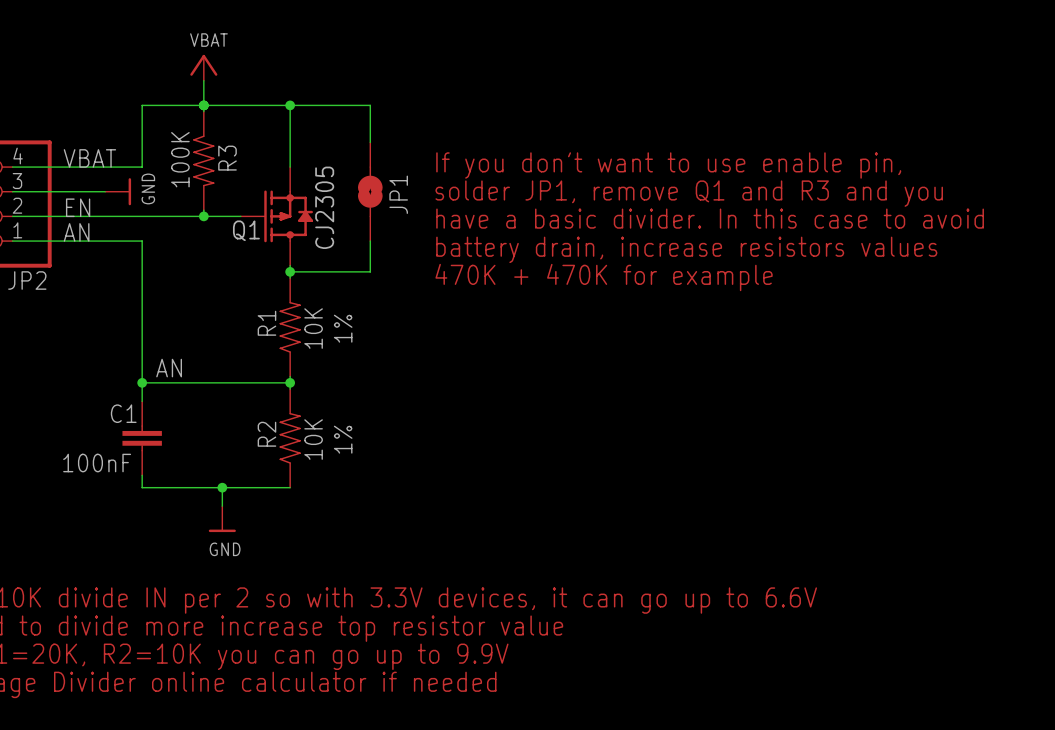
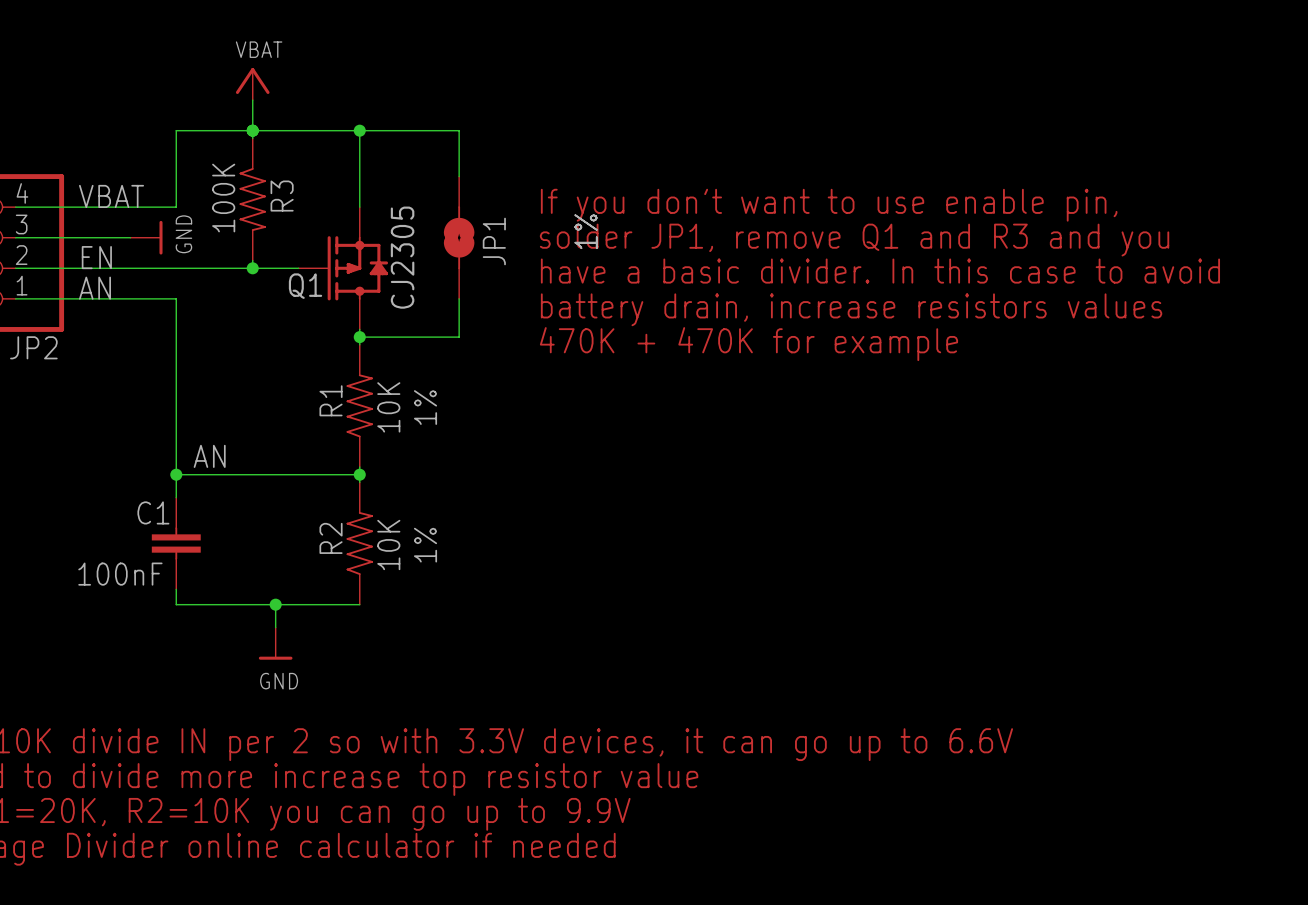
text: none -> 1% (586, 231)

